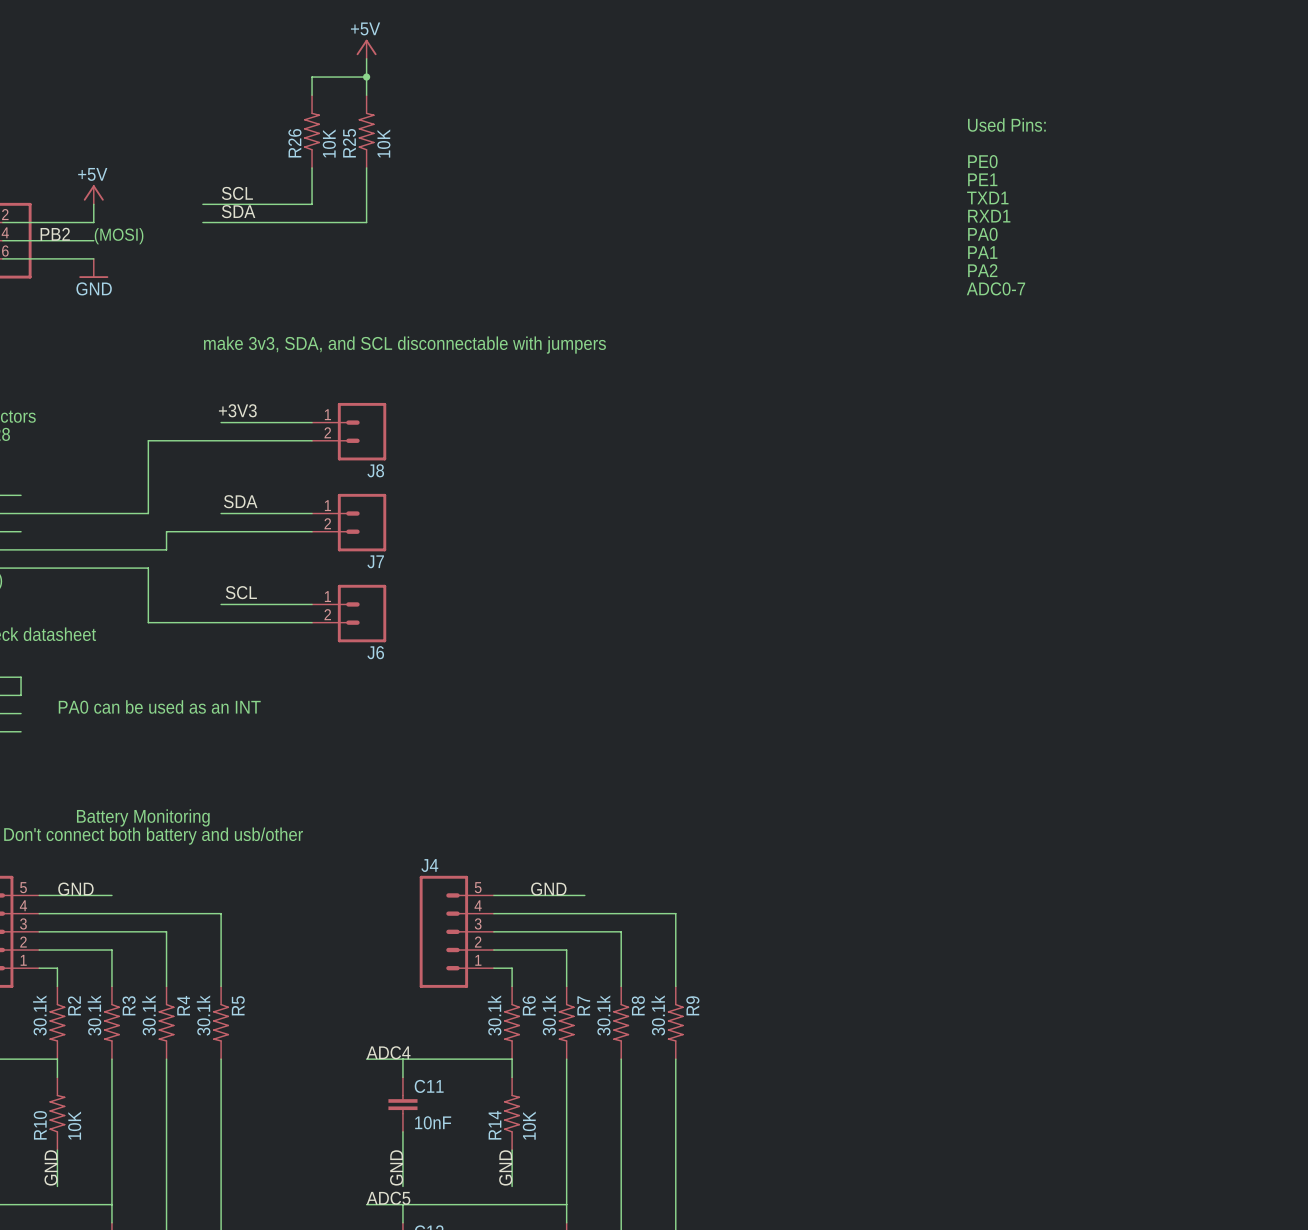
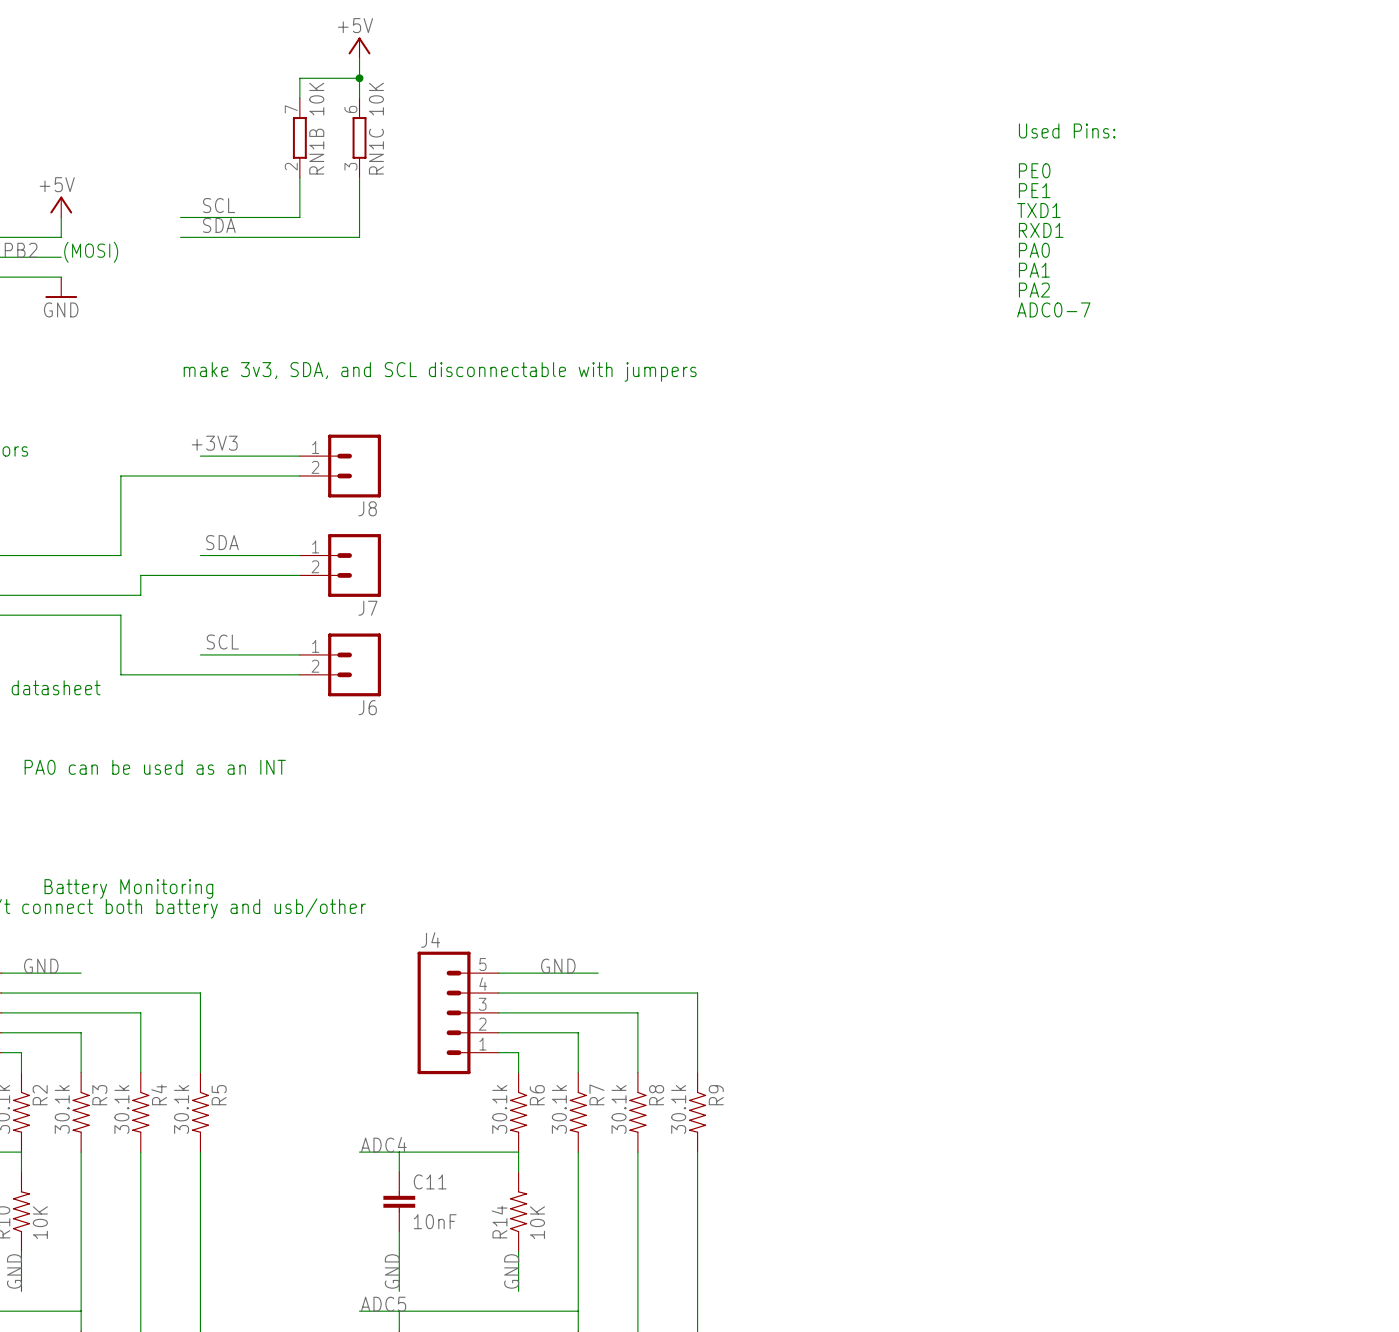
R26: 10K (312, 131) -> none
RN1B: none -> 10K (299, 137)
R25: 10K (366, 131) -> none
RN1C: none -> 10K (359, 137)

